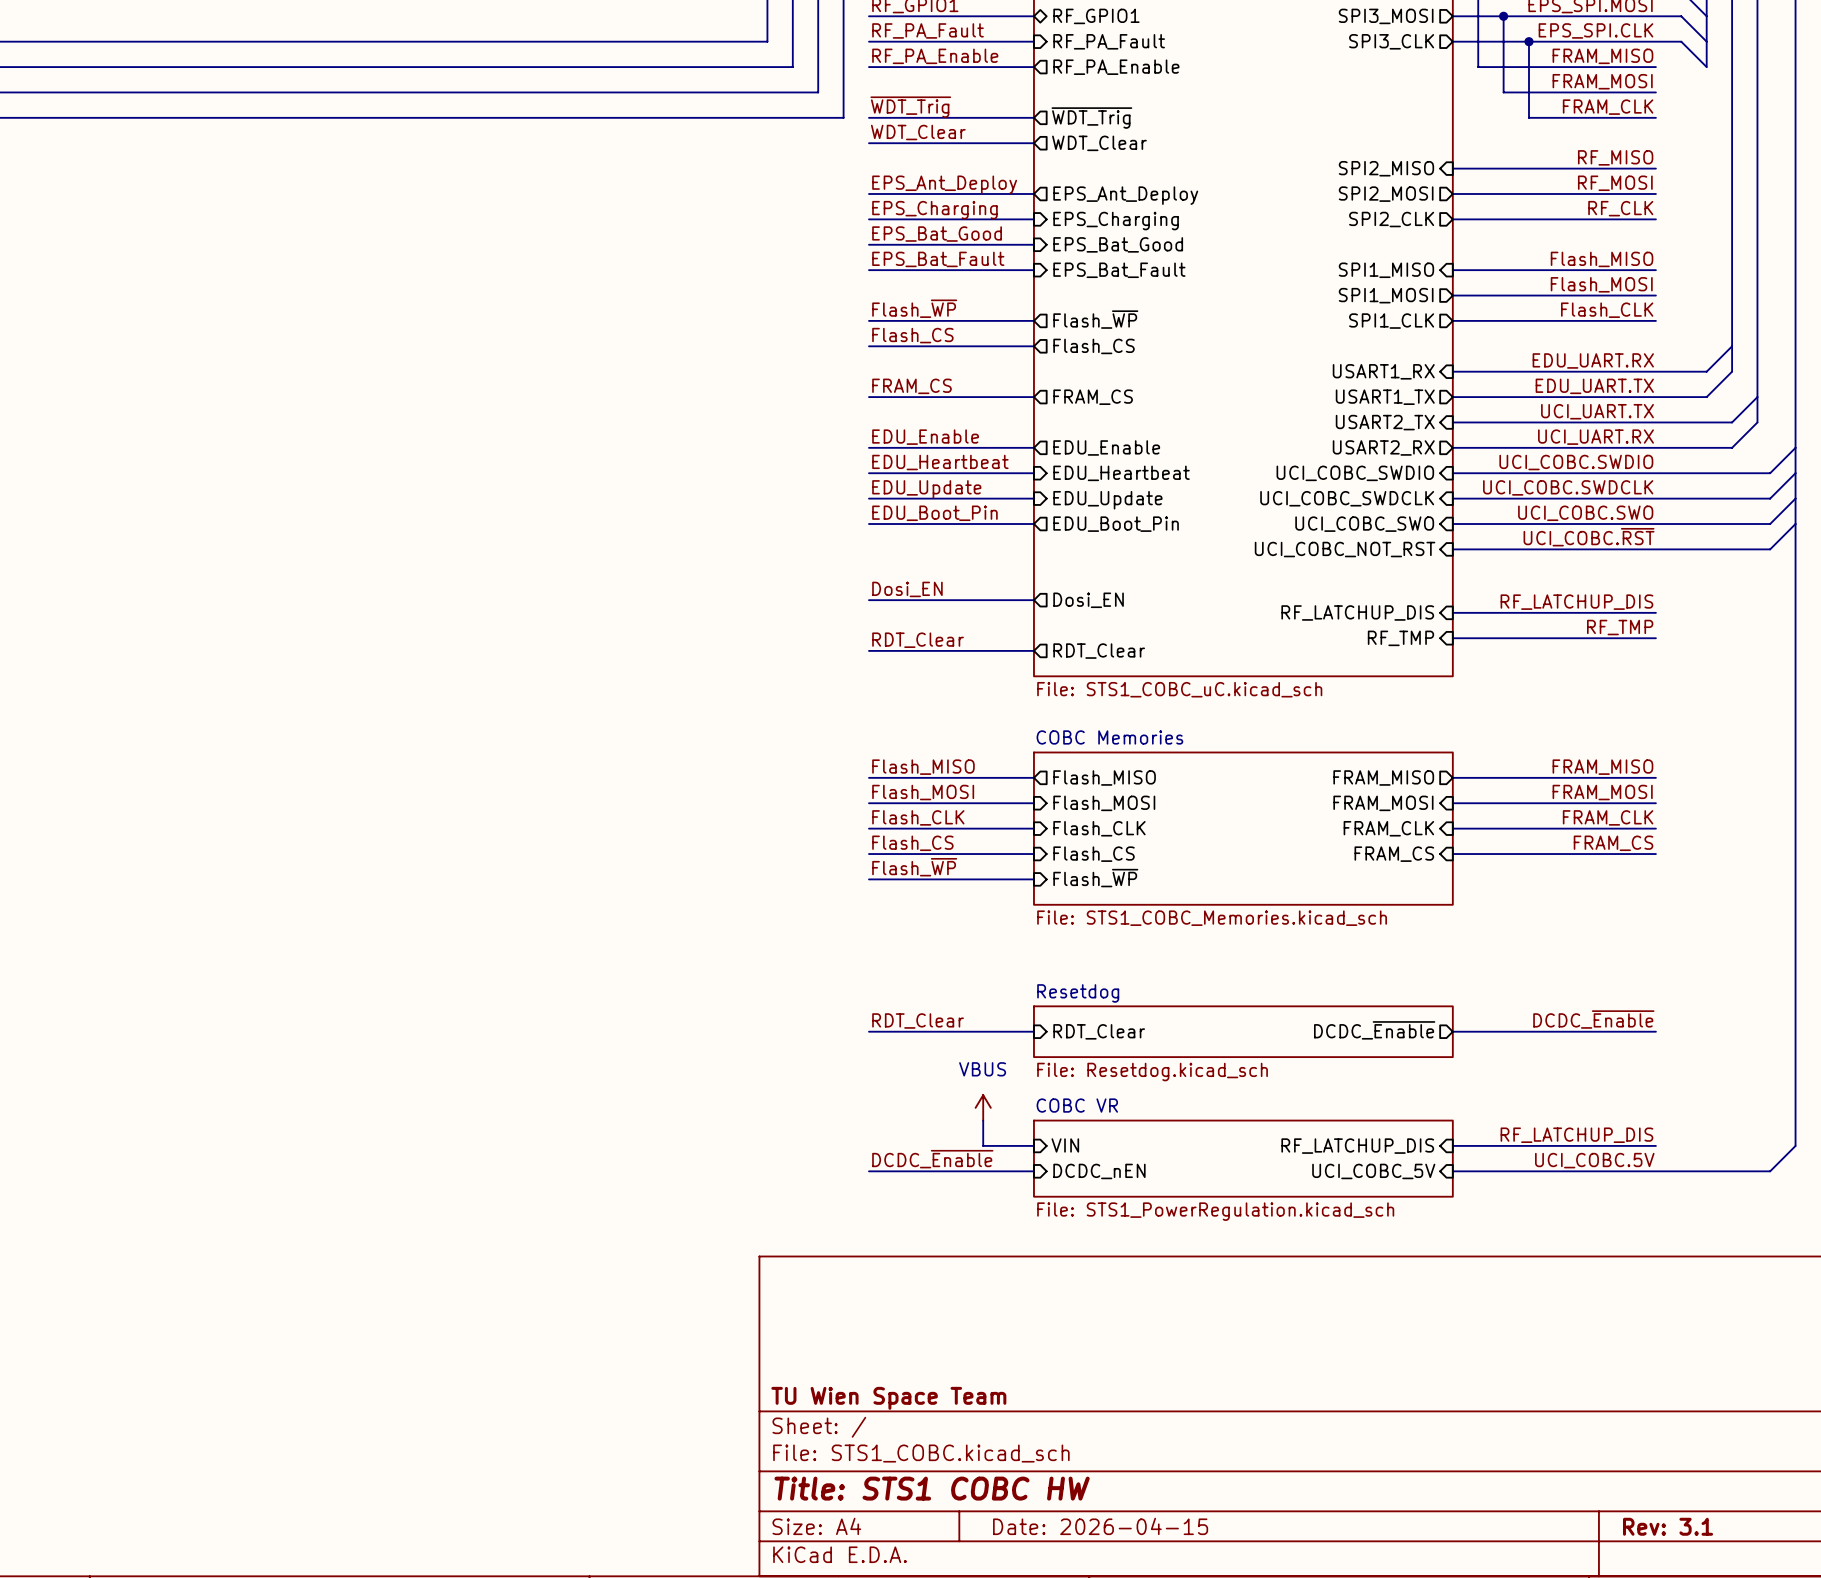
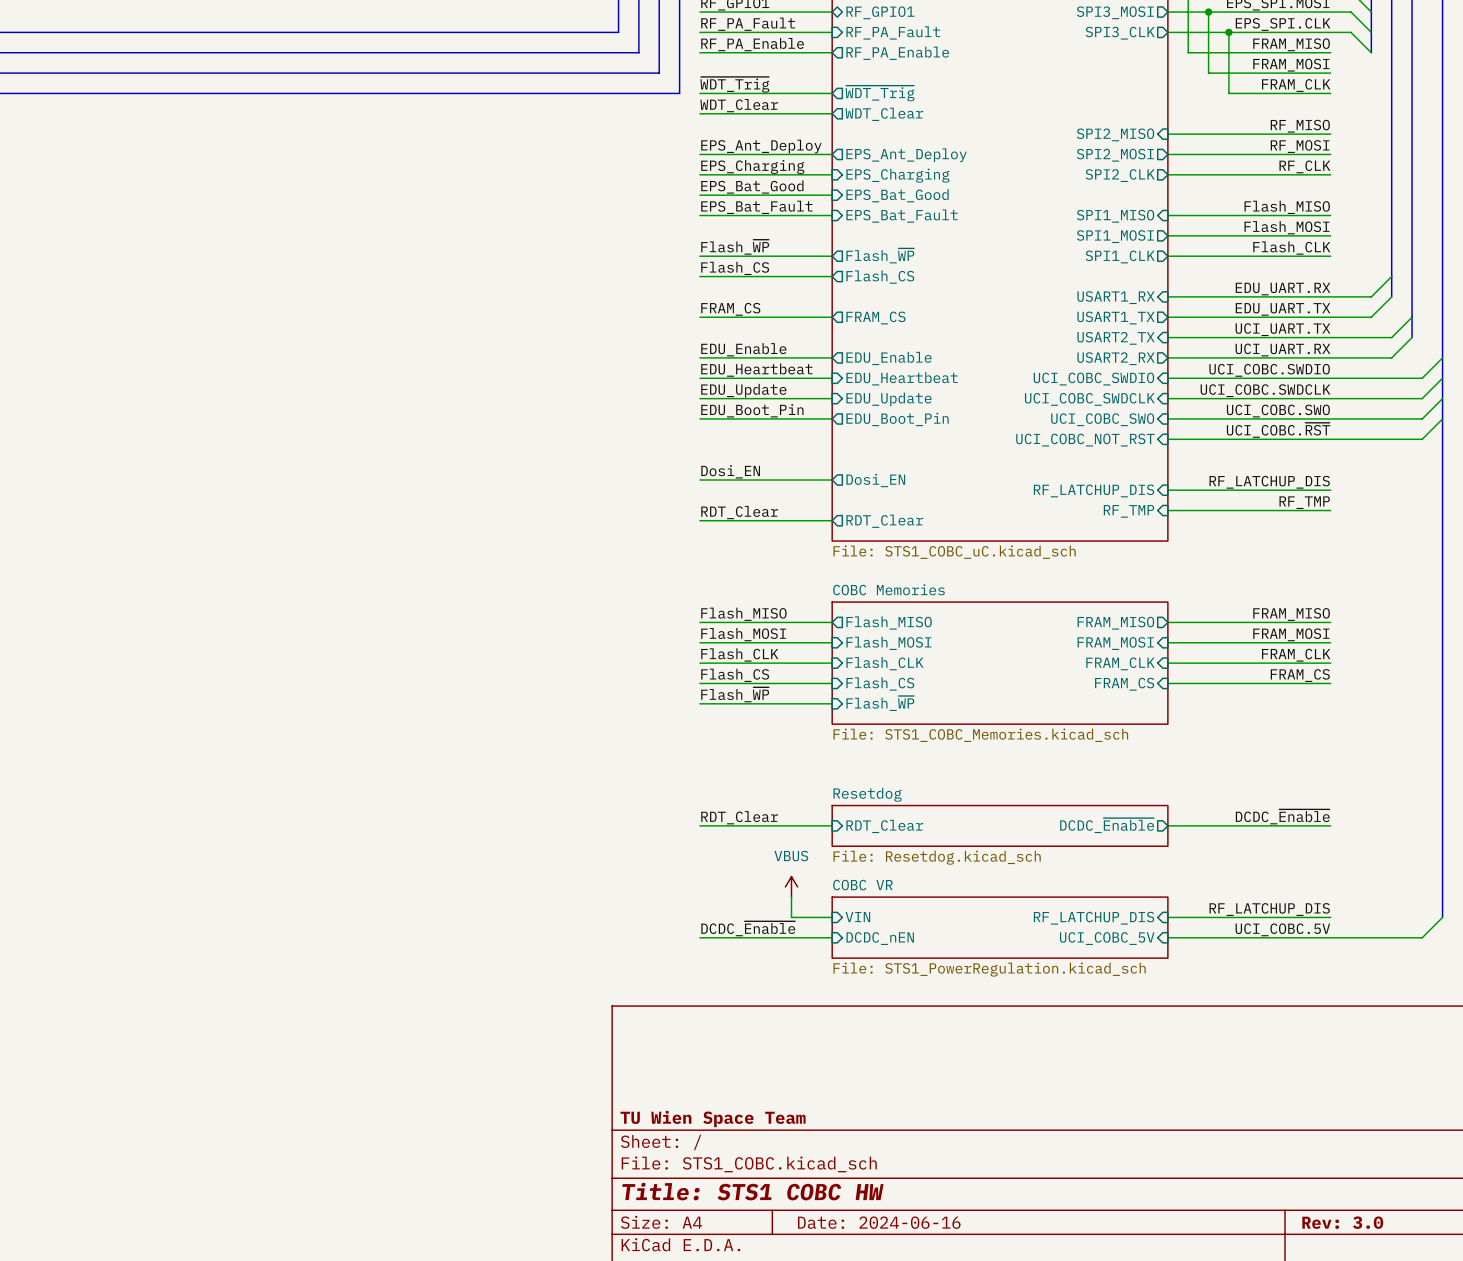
title block: Date: 2026-04-15 (1100, 1526) -> Date: 2024-06-16 (879, 1222)
title block: Rev: 3.1 (1668, 1526) -> Rev: 3.0 (1342, 1222)

